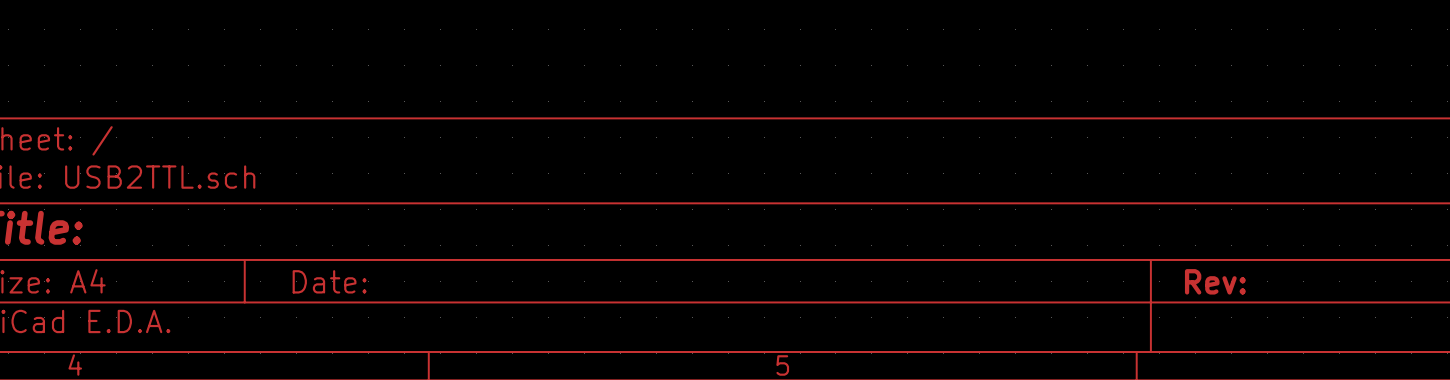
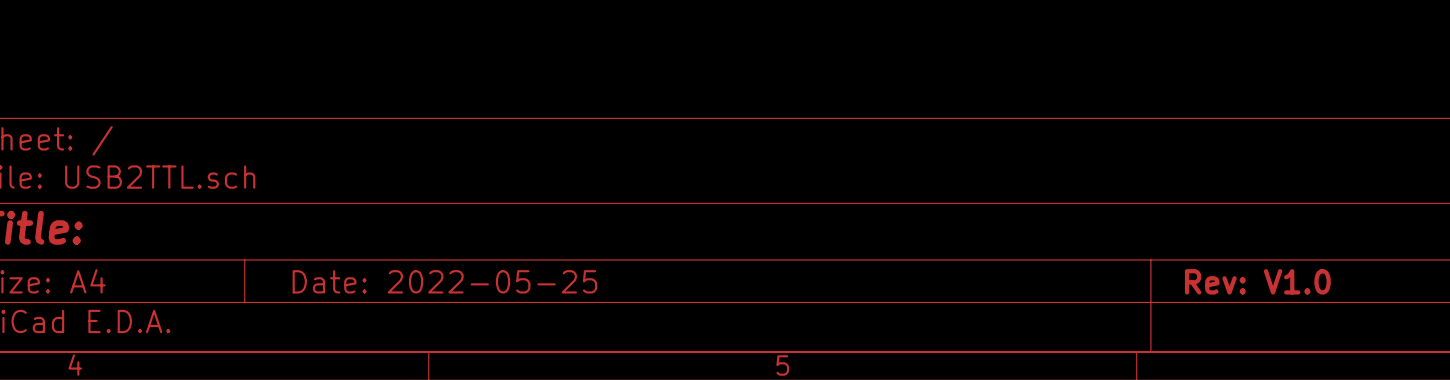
title block: Date: (329, 281) -> Date: 2022-05-25 (444, 281)
title block: Rev: (1215, 281) -> Rev: V1.0 (1257, 281)

